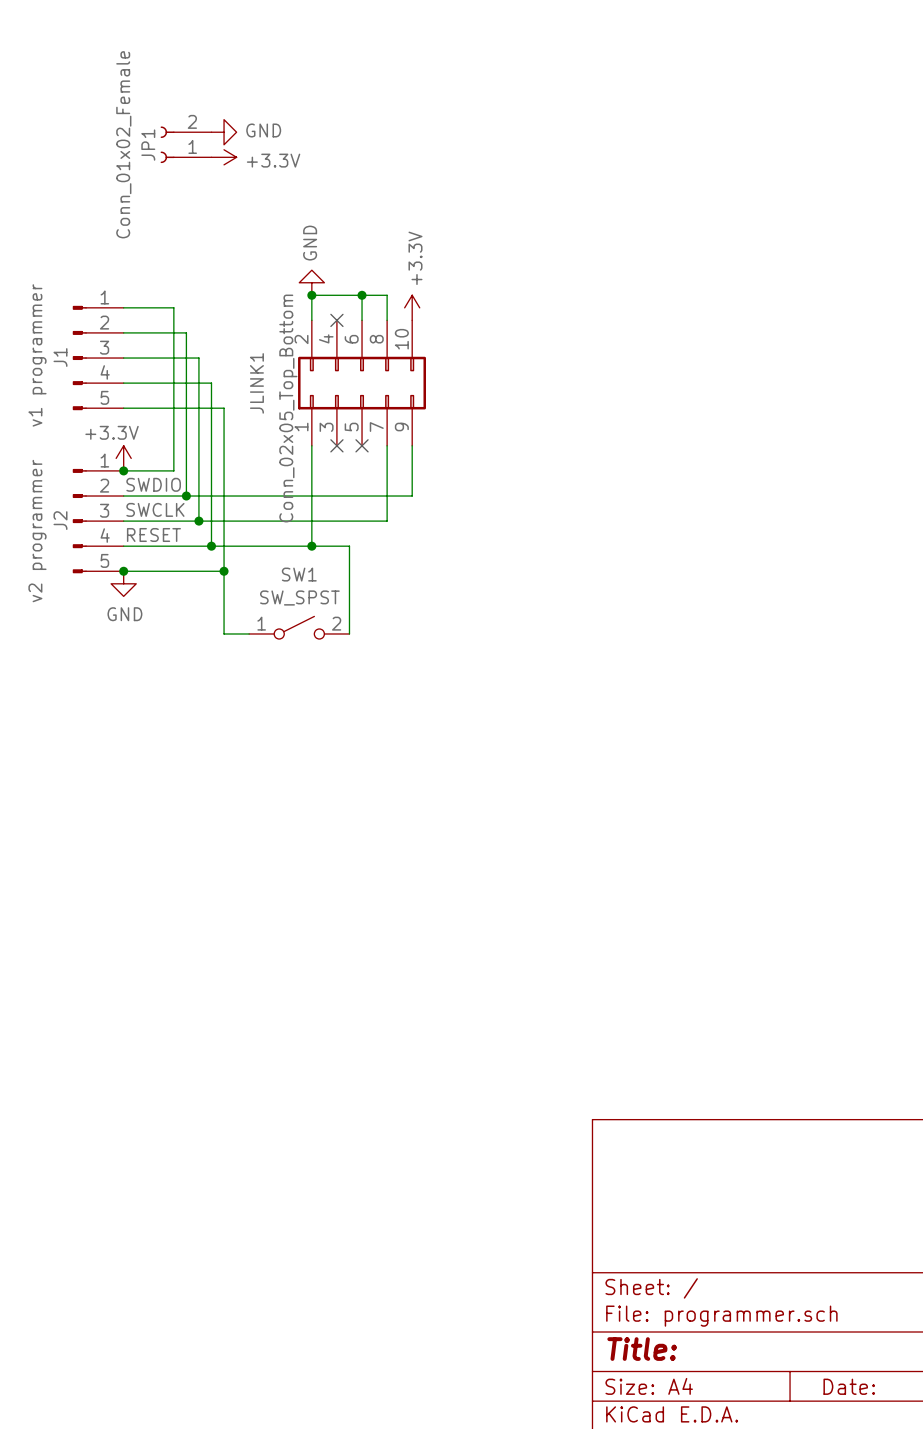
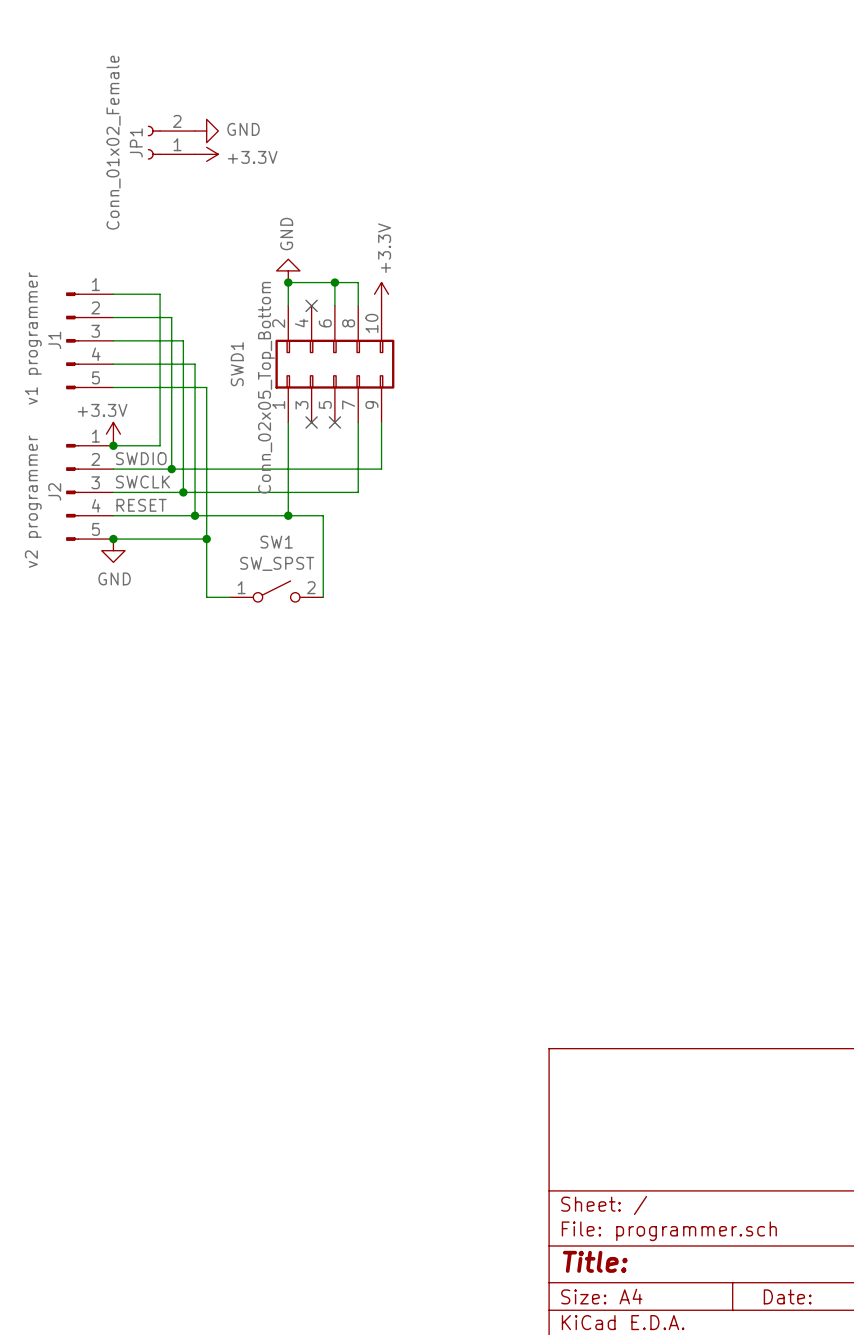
JLINK1 name: JLINK1 (256, 383) -> SWD1 (237, 364)

